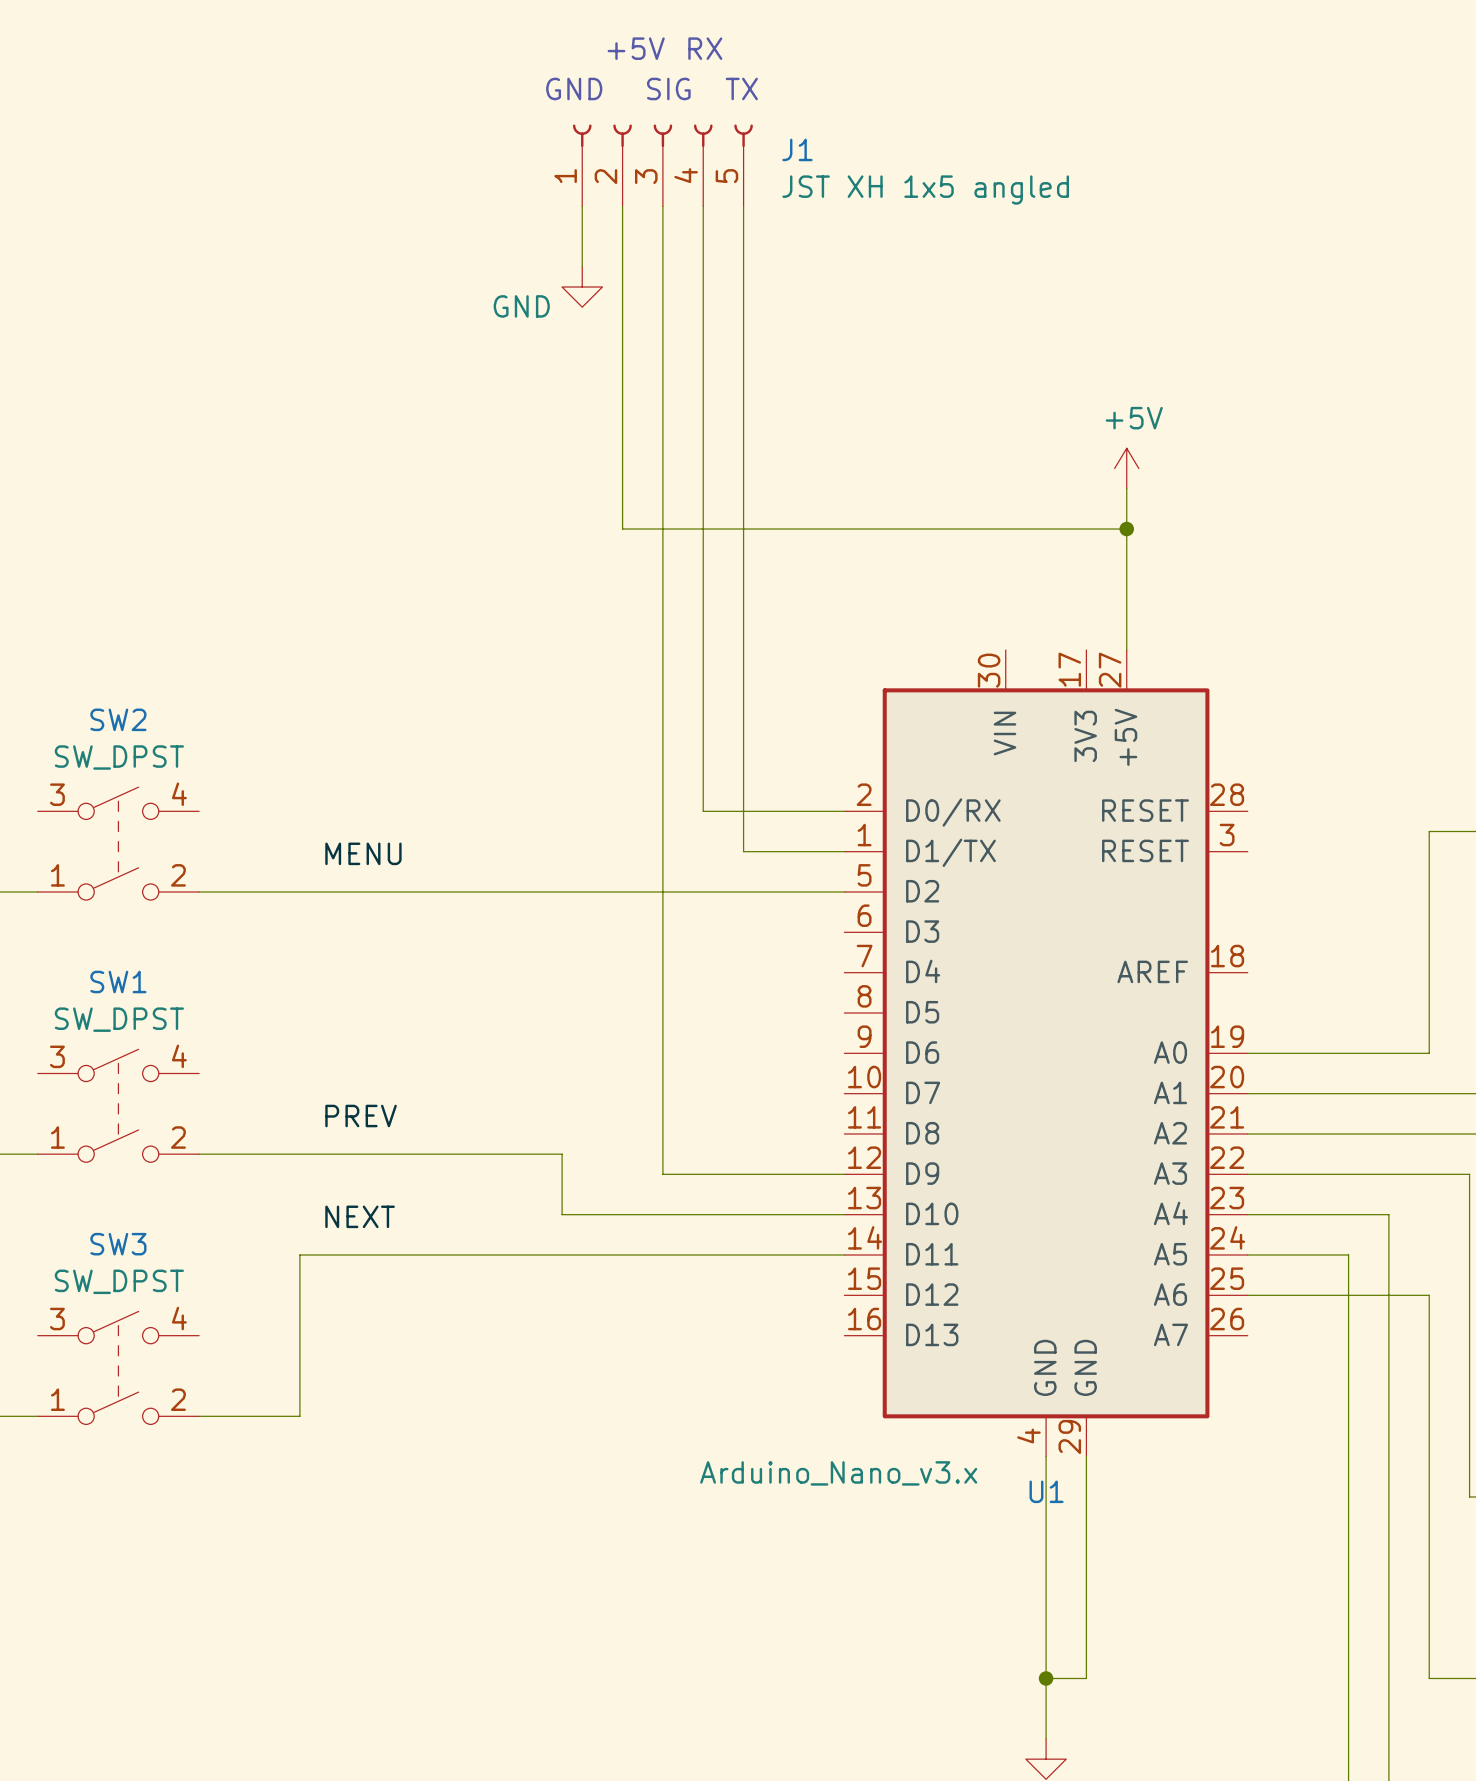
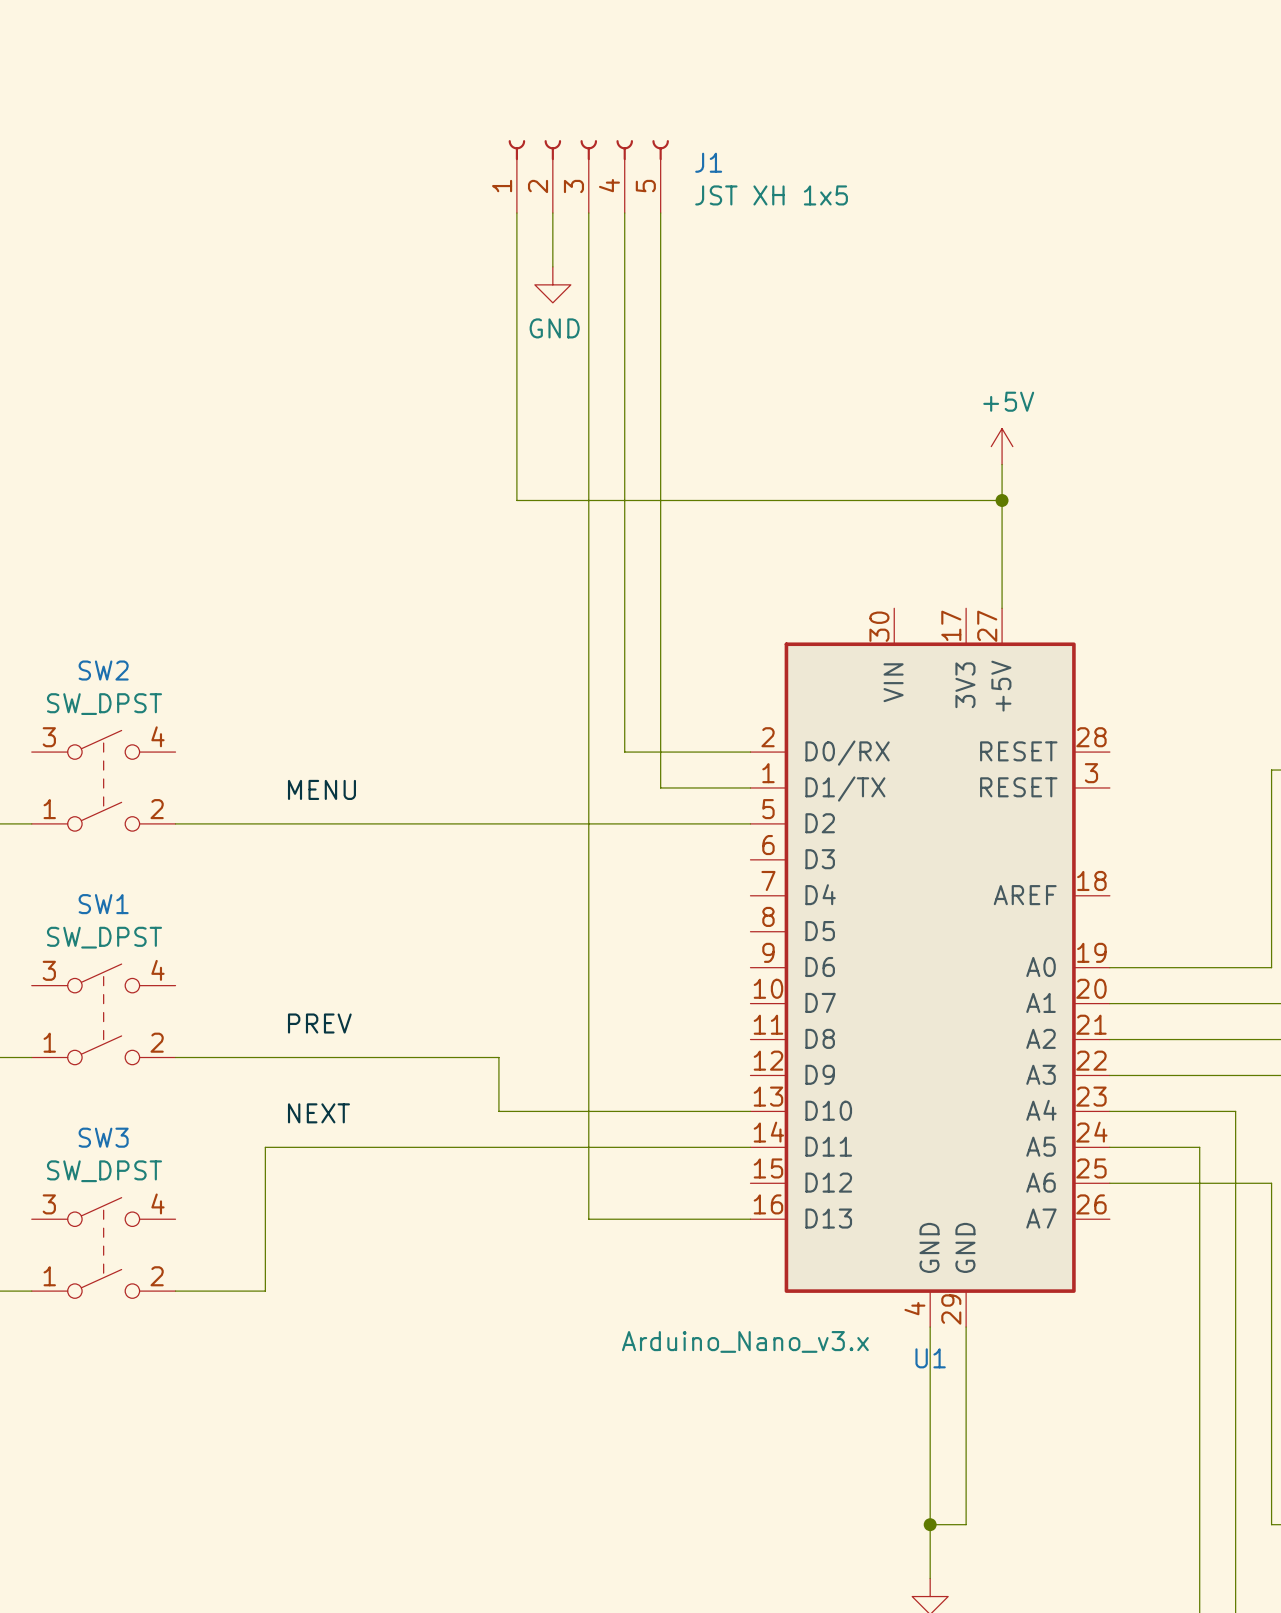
text: +5V (636, 48) -> none
text: RX (705, 48) -> none
text: GND (574, 88) -> none
text: SIG (668, 88) -> none
text: TX (741, 88) -> none
J1 value: JST XH 1x5 angled (925, 189) -> JST XH 1x5 (771, 195)
wire: (622, 266) (622, 529) -> (516, 266) (516, 500) (552, 500)
power symbol position: GND (582, 287) -> GND (552, 284)
power symbol text position: GND (521, 306) -> GND (554, 328)
wire: (662, 1174) (844, 1174) -> (588, 1075) (588, 1219) (750, 1219)

